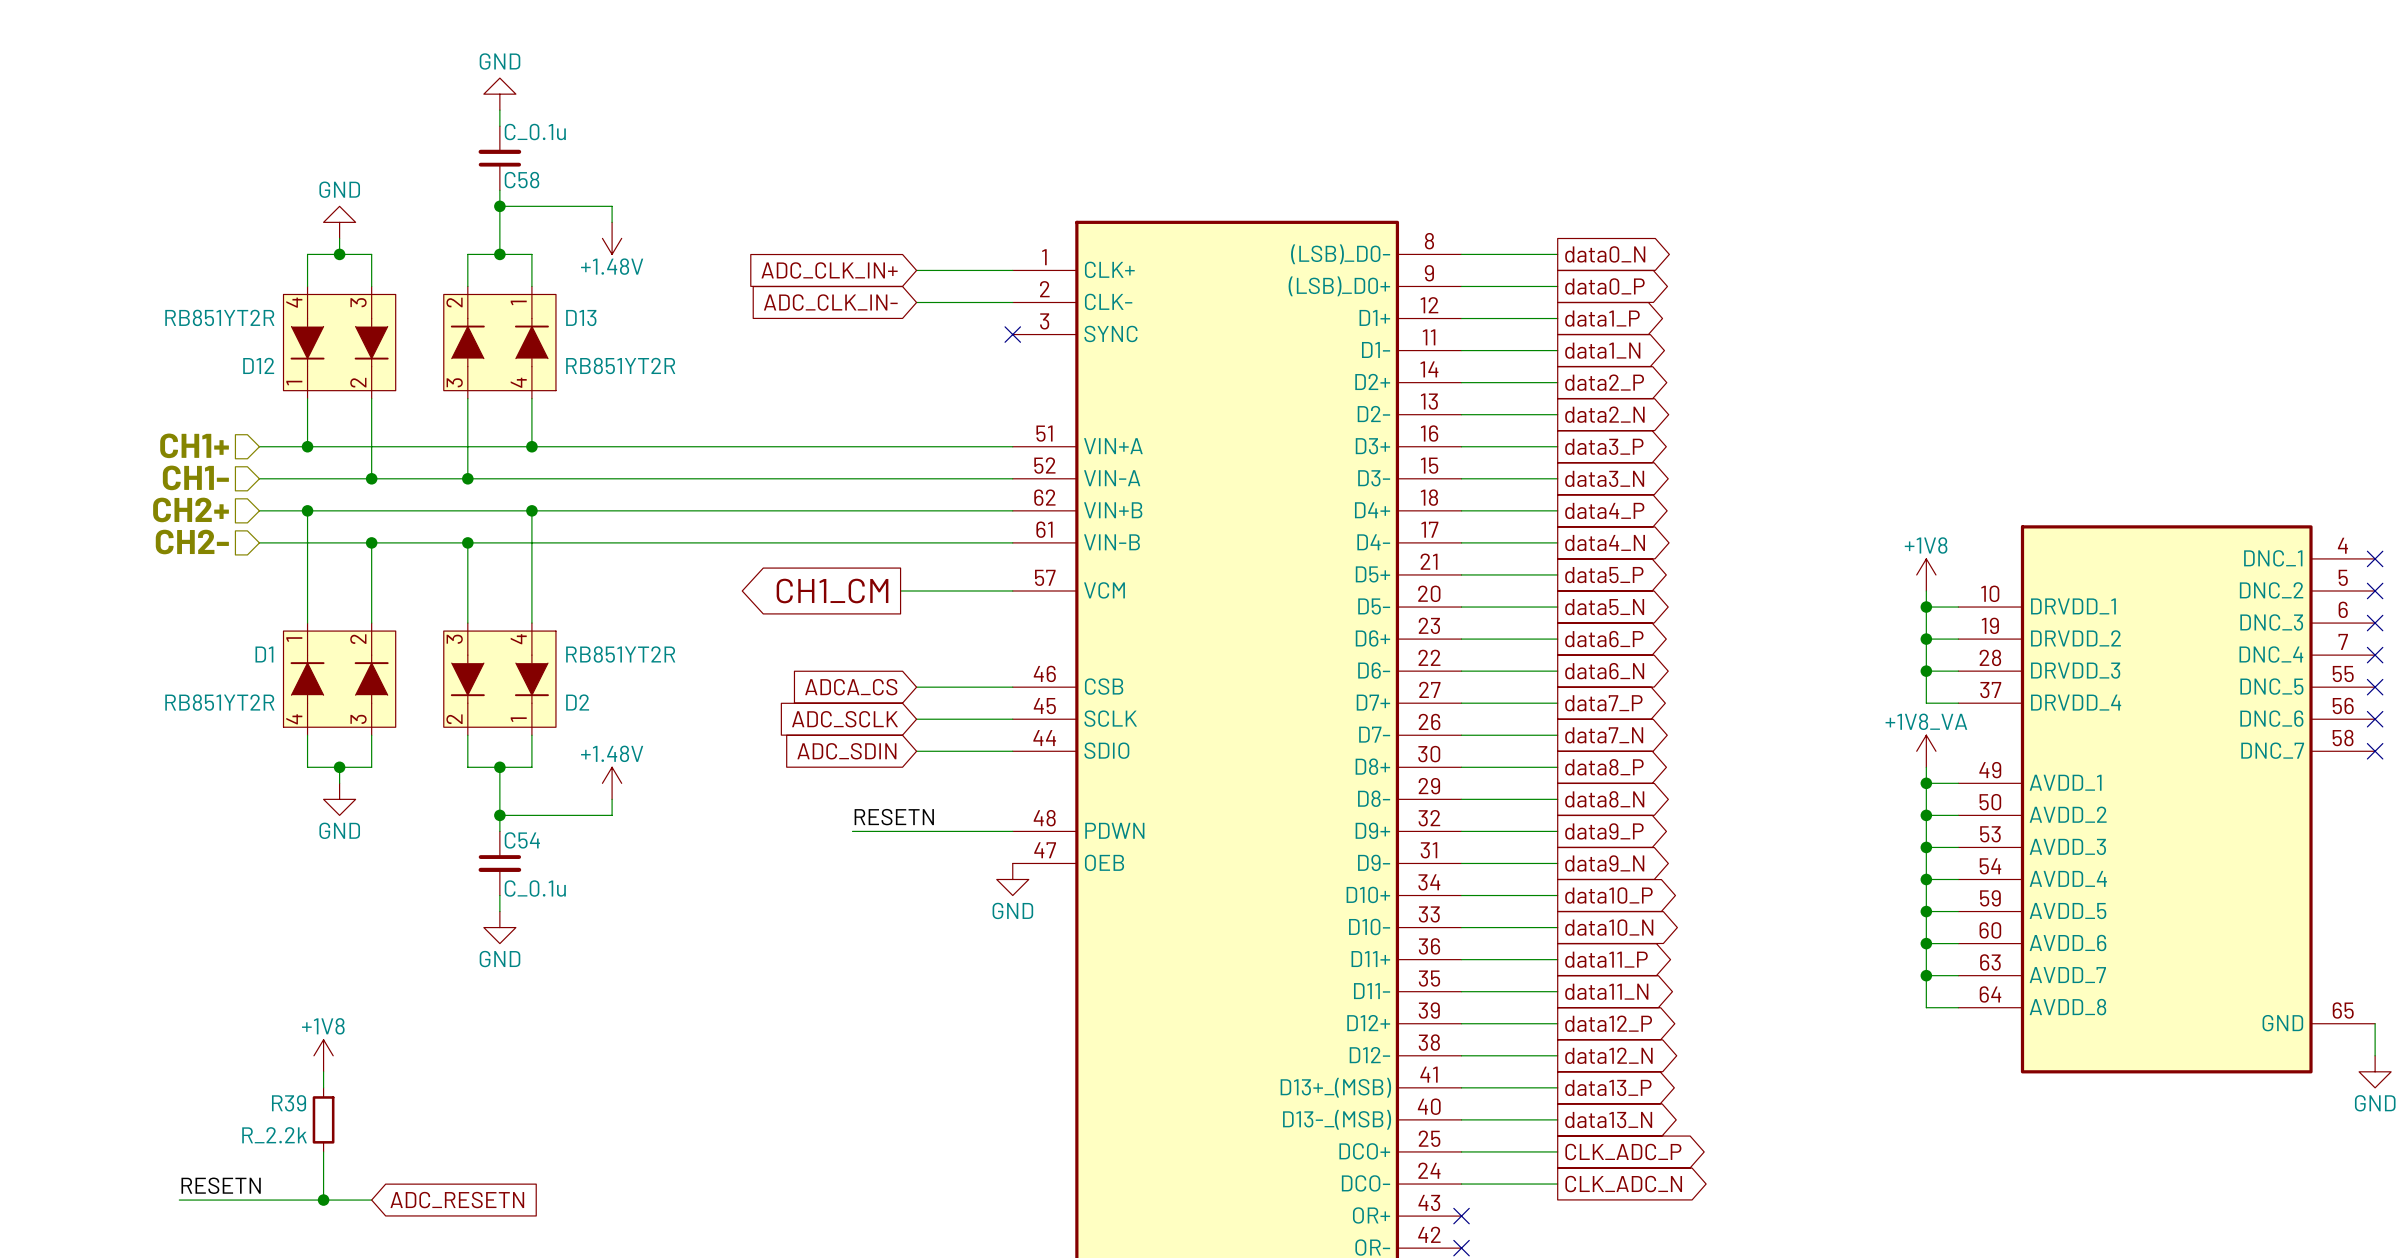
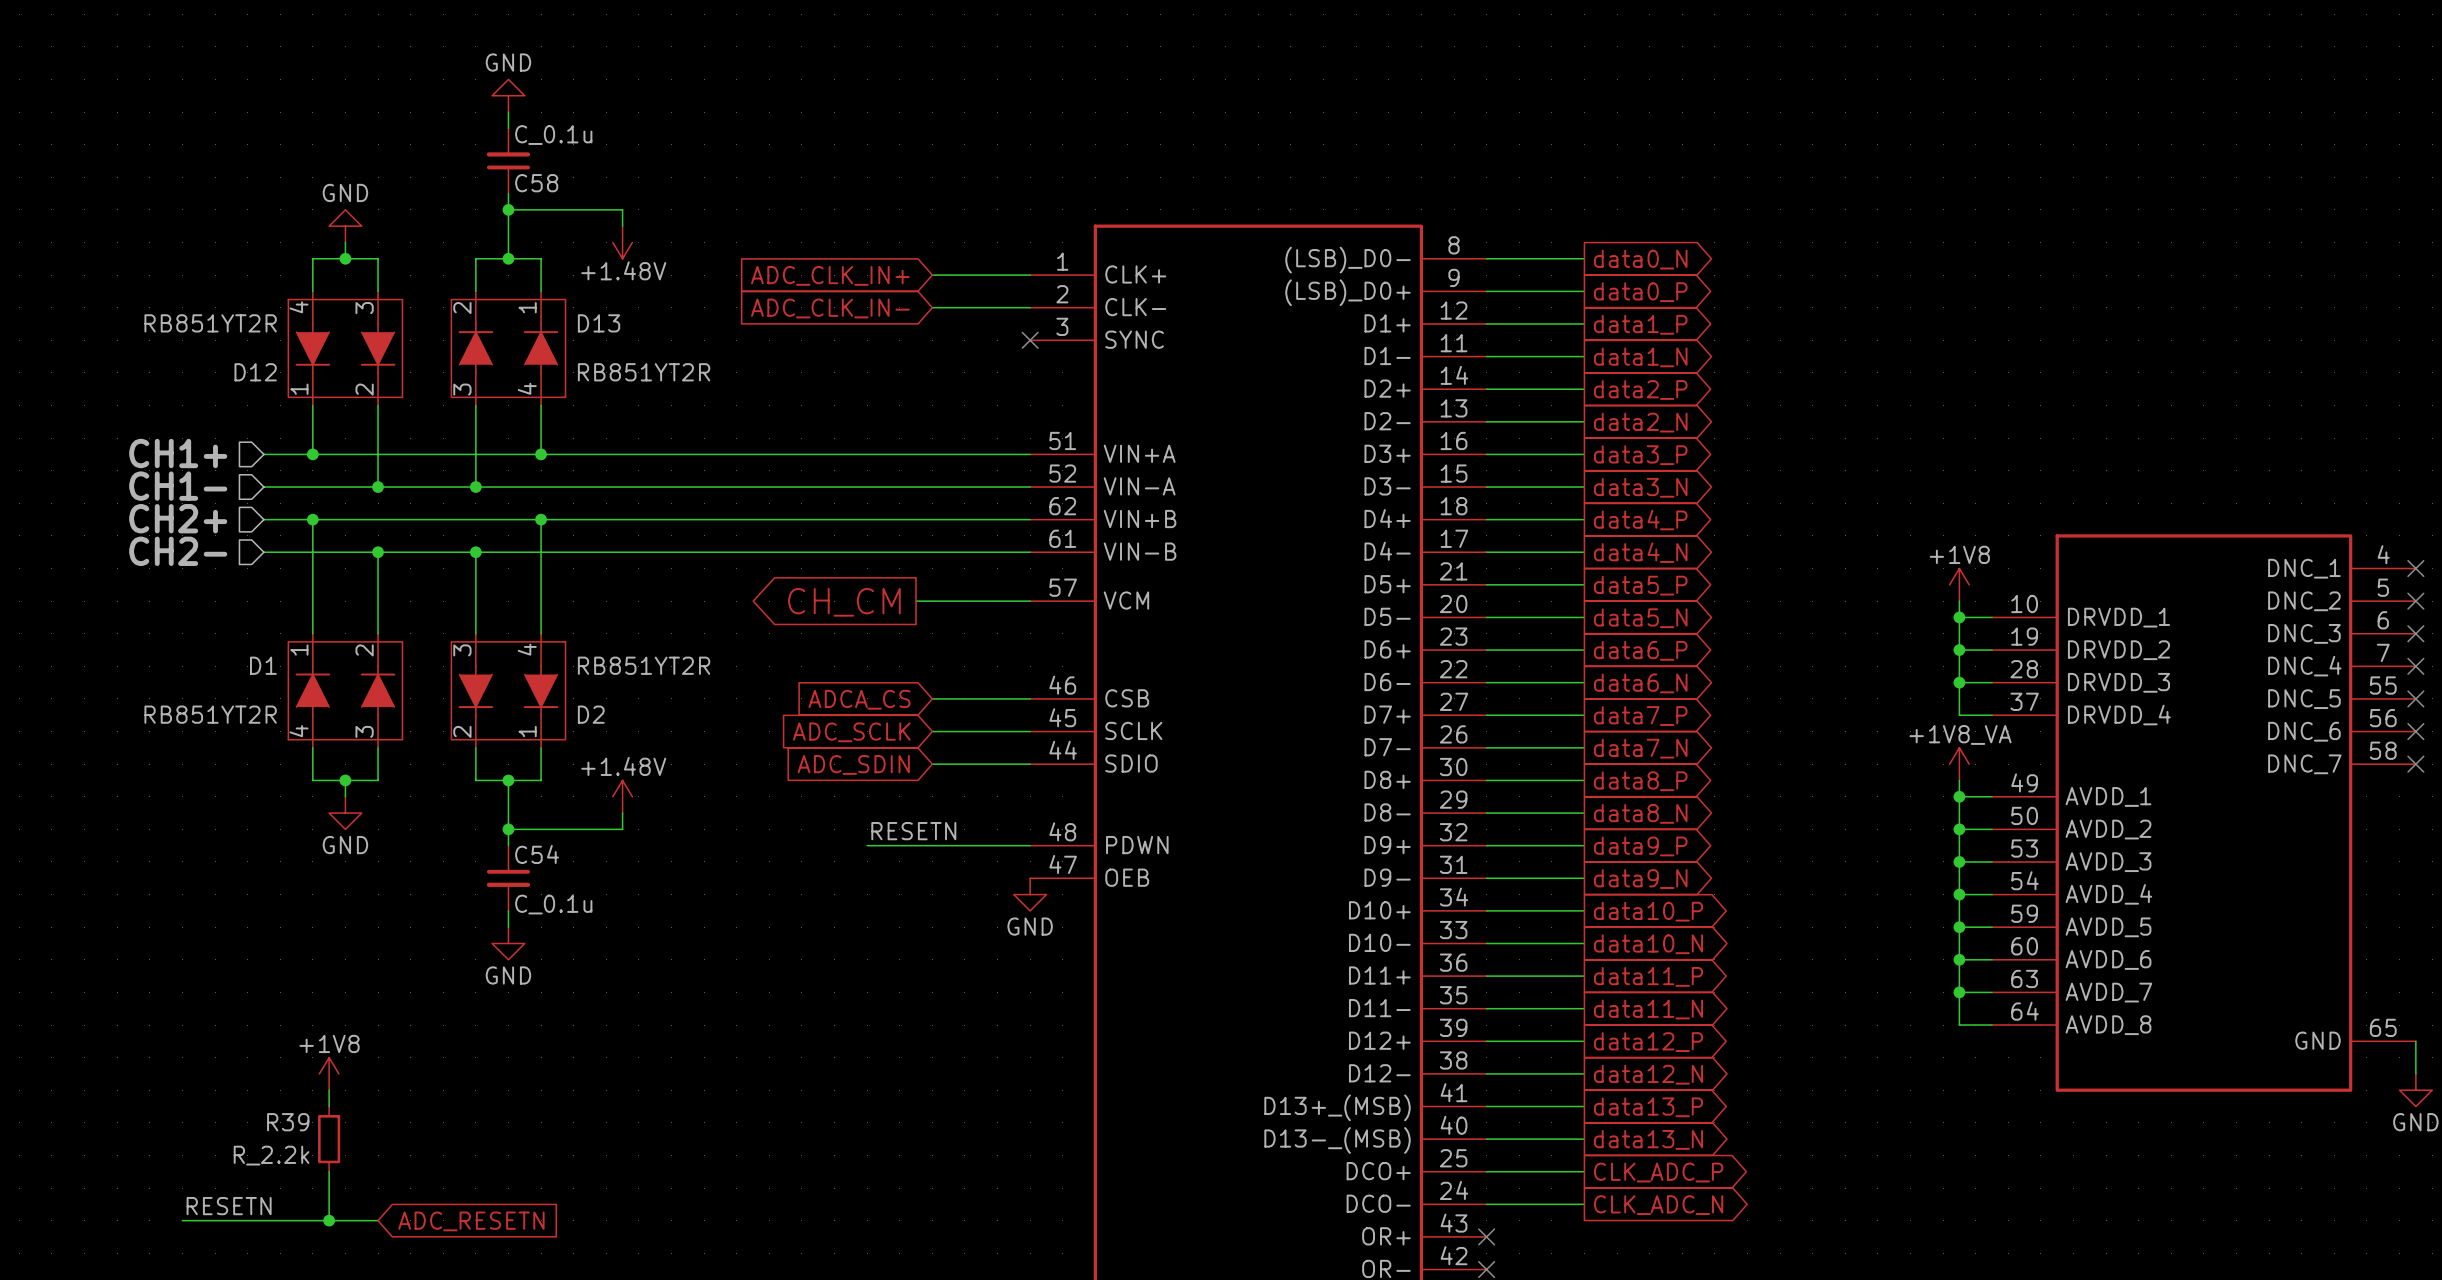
global label: CH1_CM (832, 591) -> CH_CM (844, 602)

